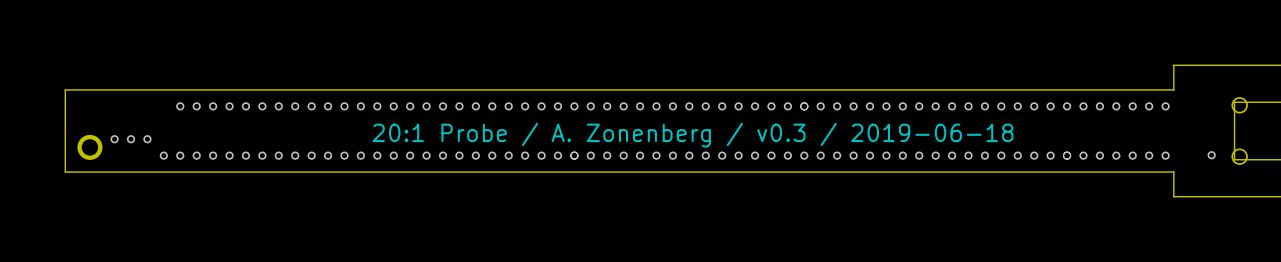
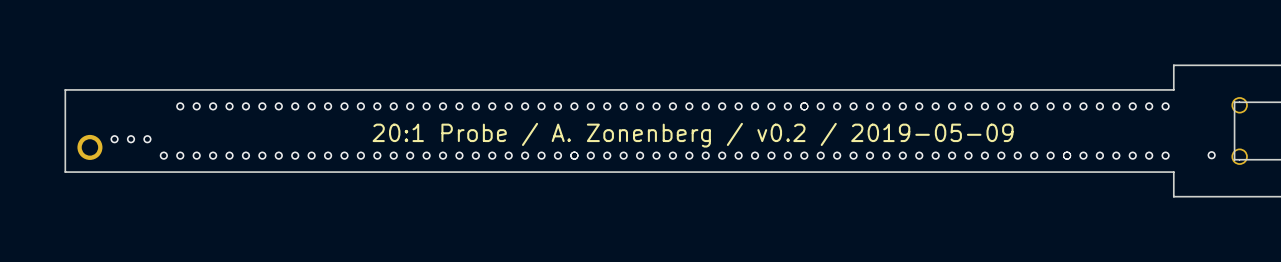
text: 20:1 Probe / A. Zonenberg / v0.3 / 2019-06-18 (693, 135) -> 20:1 Probe / A. Zonenberg / v0.2 / 2019-05-09 (693, 135)

